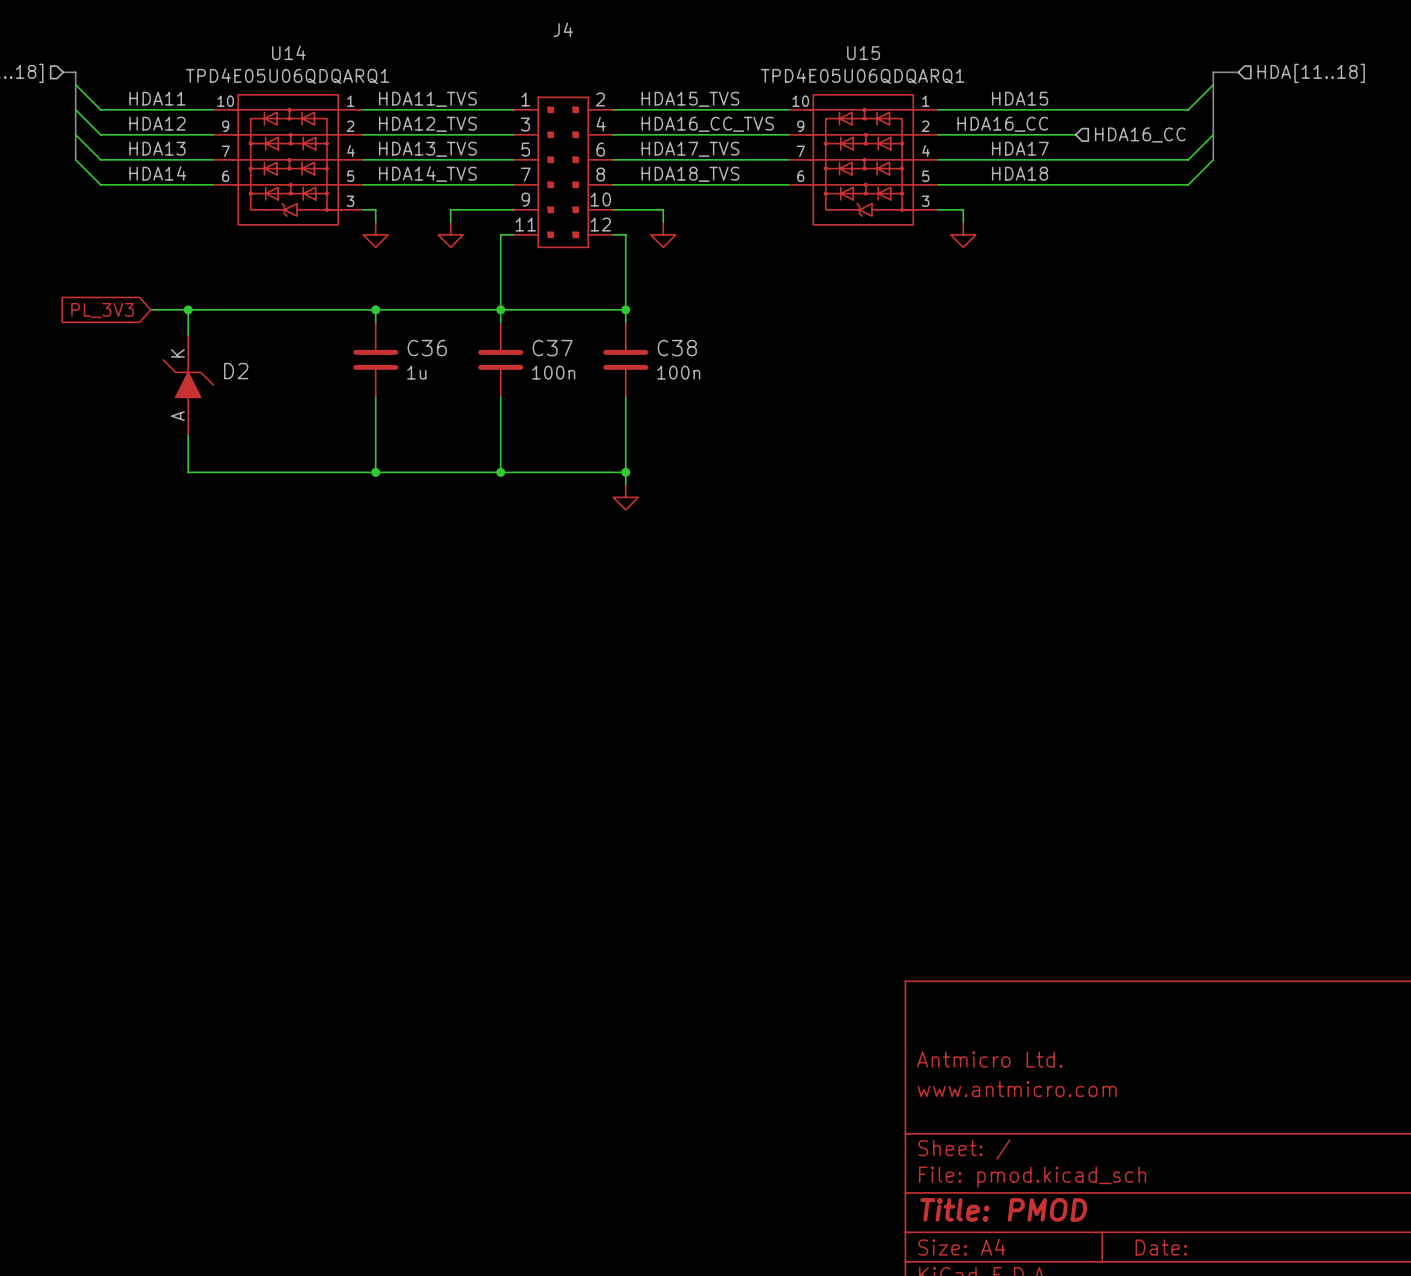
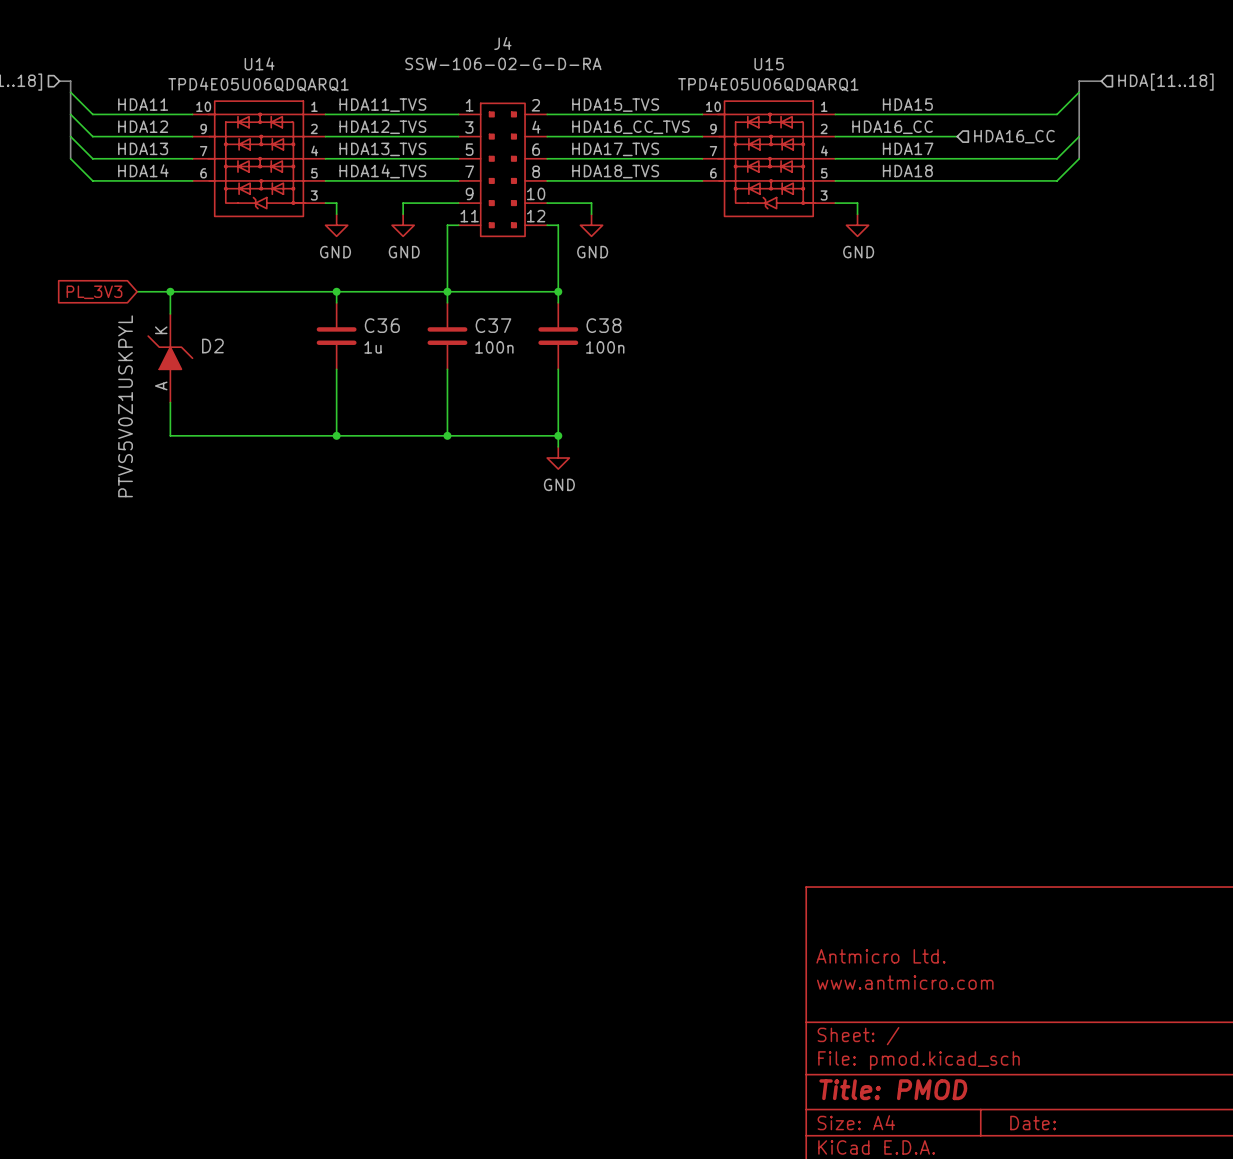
J4 value: none -> SSW-106-02-G-D-RA (503, 63)
power symbol text: none -> GND (335, 252)
power symbol text: none -> GND (404, 252)
power symbol text: none -> GND (592, 252)
power symbol text: none -> GND (858, 252)
D2 value: none -> PTVS5V0Z1USKPYL (125, 406)
power symbol text: none -> GND (559, 484)

